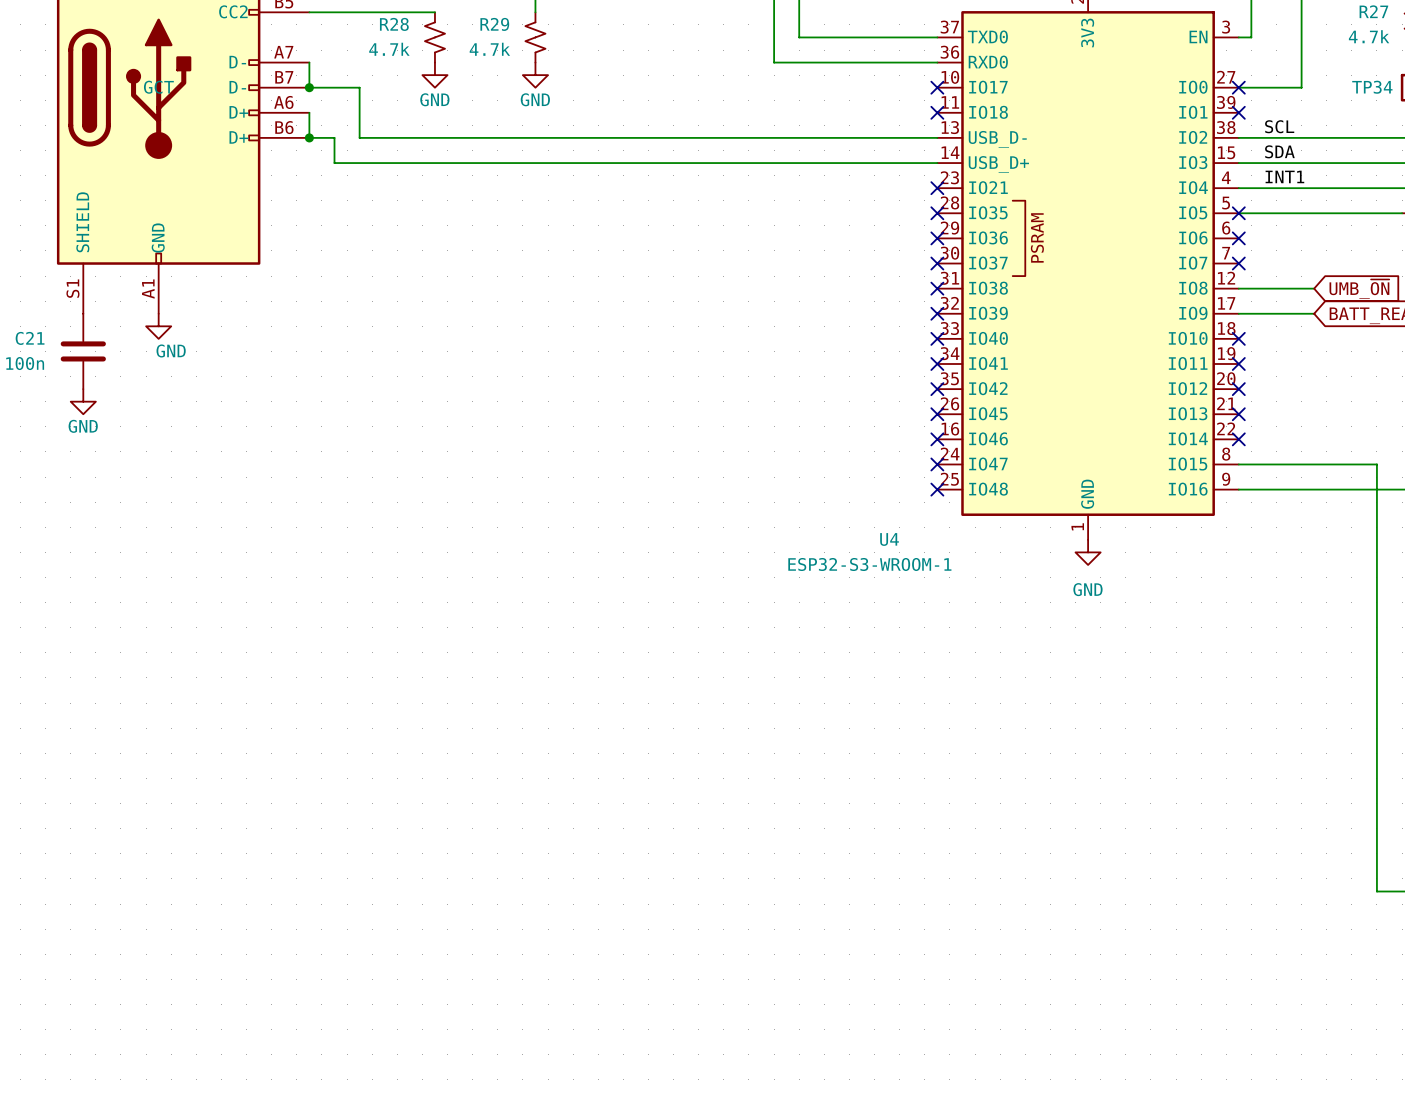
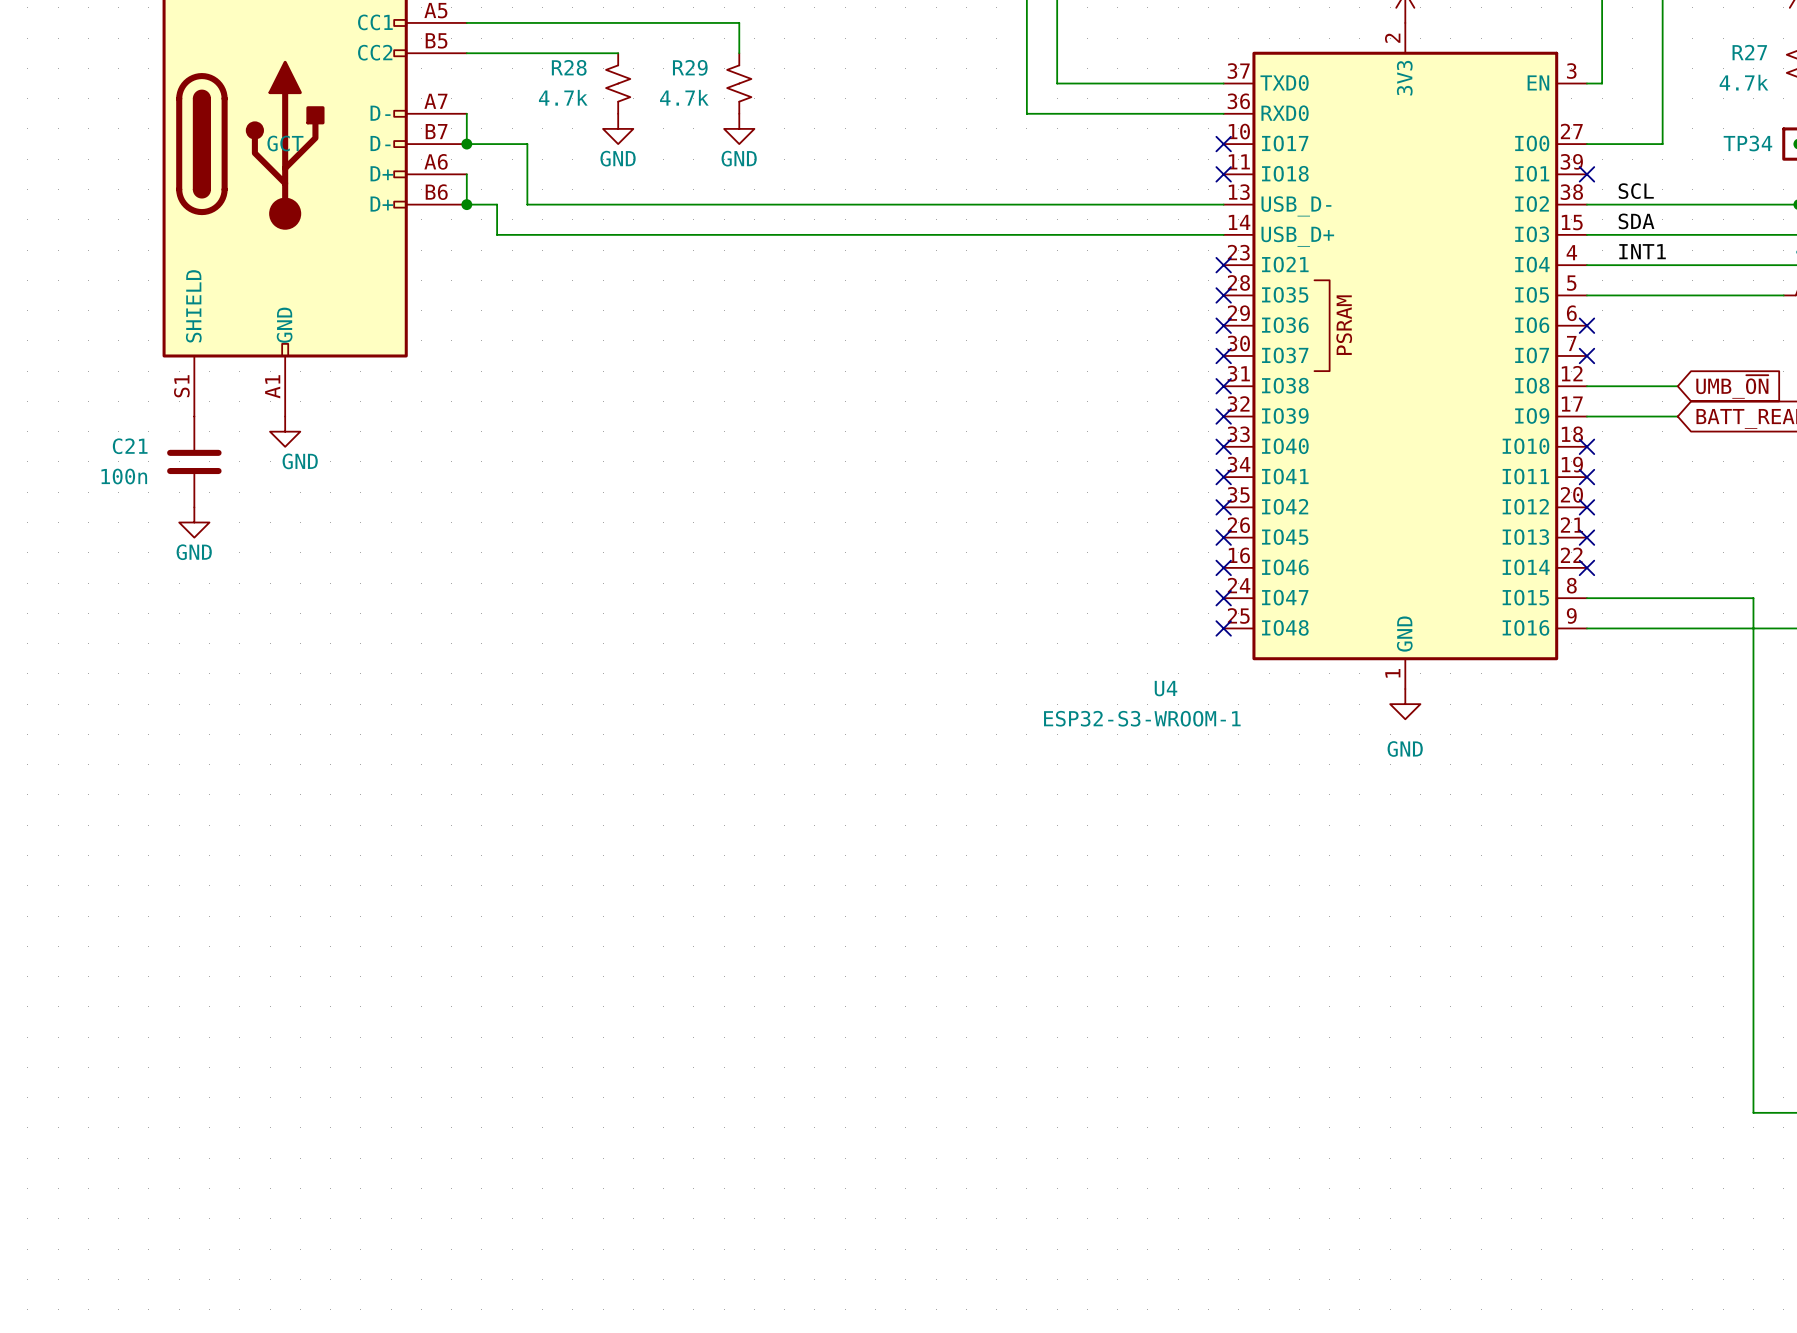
no-connect mark: (1238, 87) -> none
no-connect mark: (1238, 213) -> none

